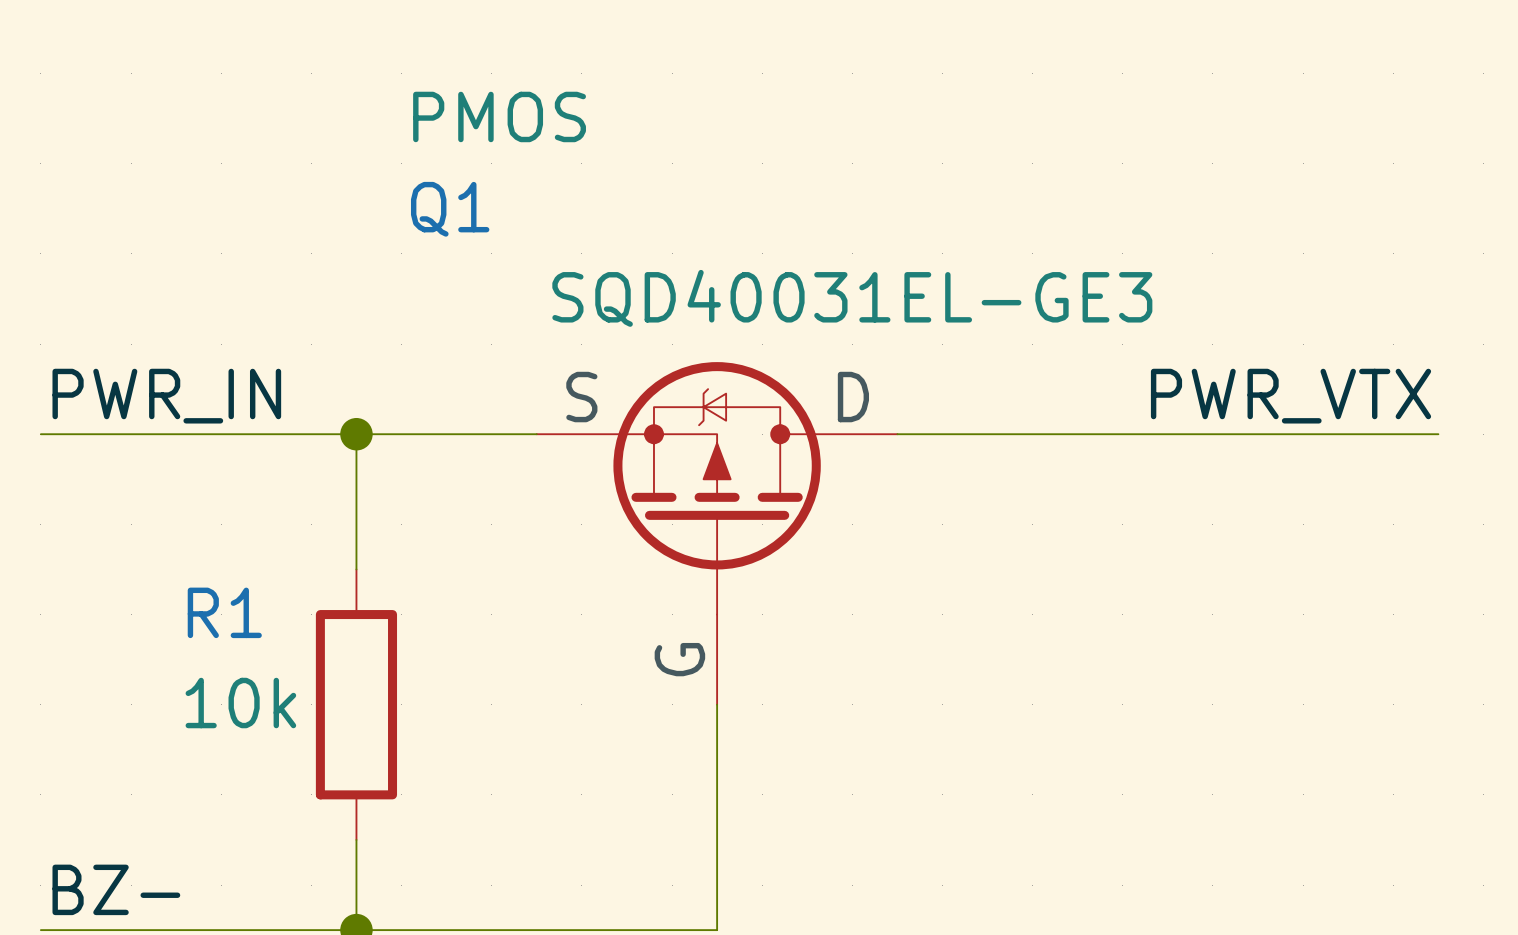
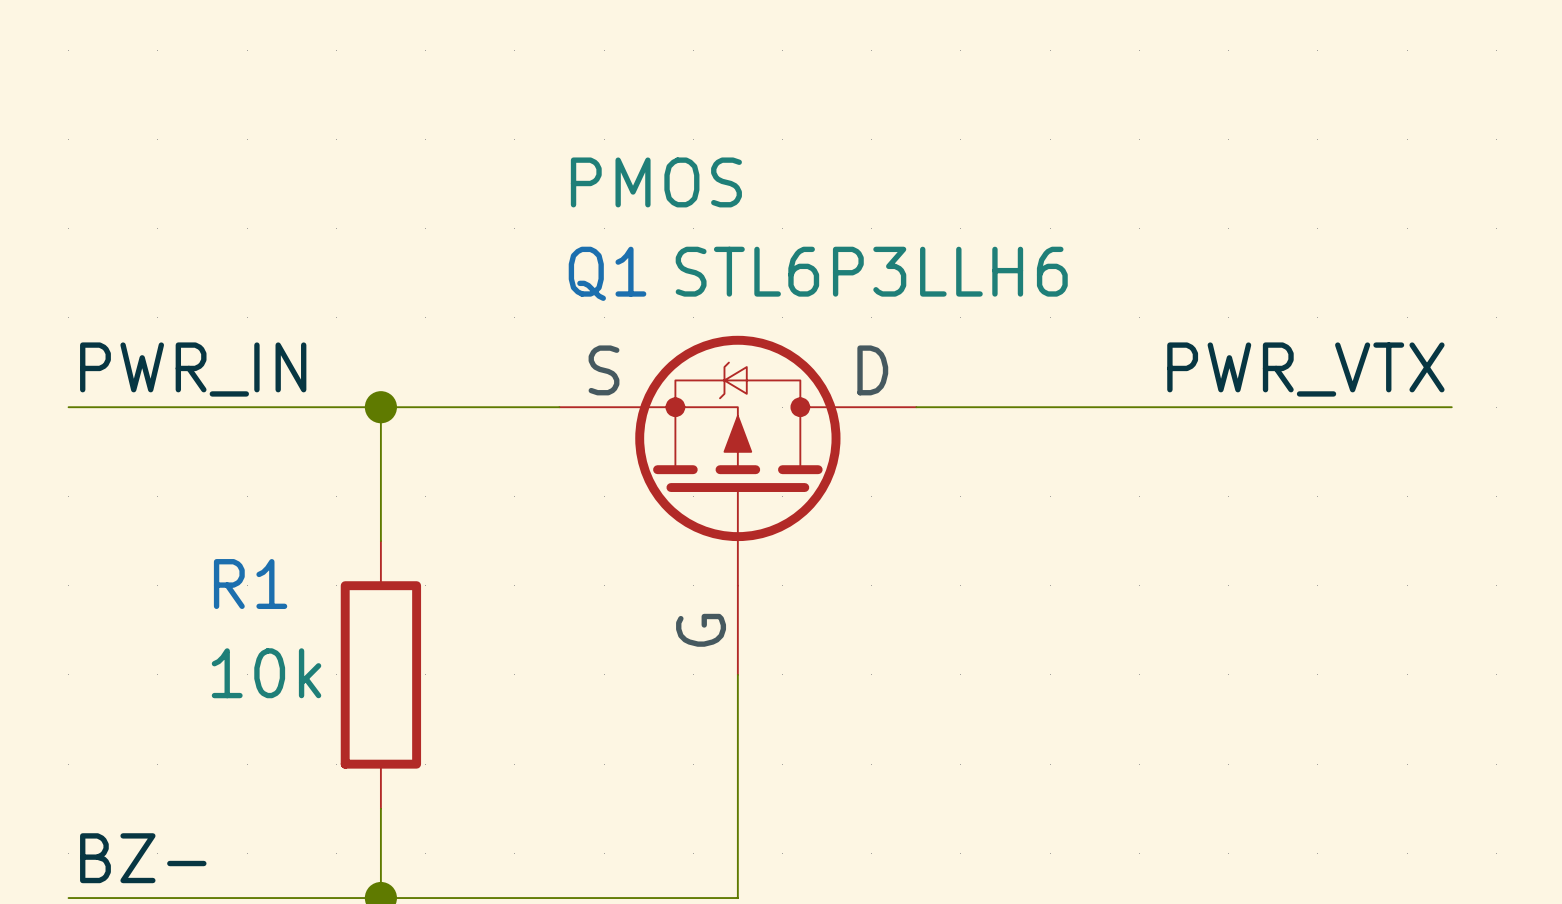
Q1 value position: PMOS (499, 116) -> PMOS (656, 182)
Q1 name position: Q1 (450, 209) -> Q1 (607, 273)
Q1 text: SQD40031EL-GE3 (852, 298) -> STL6P3LLH6 (871, 271)

